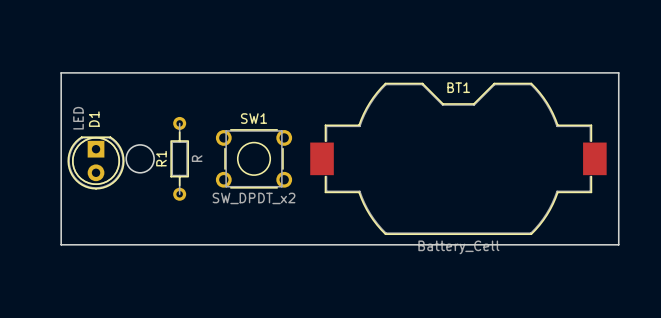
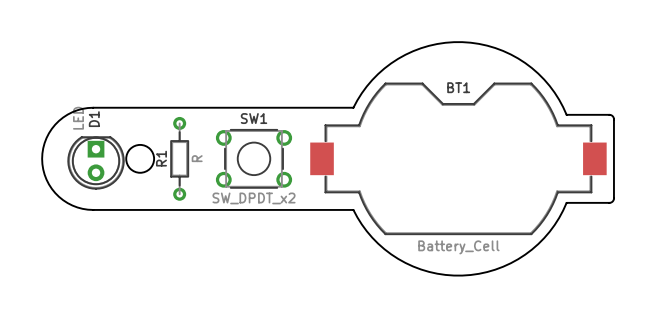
board edge: (61, 72) (618, 72) (618, 244) (61, 244) (61, 72) -> (93, 107) (72, 112) (59, 120) (48, 133) (43, 148) (42, 164) (46, 179) (55, 193) (72, 205) (93, 209) (353, 209) (366, 231) (384, 249) (405, 262) (437, 273) (470, 274) (503, 266) (525, 254) (538, 244) (554, 225) (566, 202) (610, 202) (613, 198) (613, 116) (609, 114) (566, 114) (549, 85) (531, 68) (503, 50) (479, 43) (445, 42) (429, 45) (405, 54) (384, 68) (372, 80) (353, 107) (93, 107)

